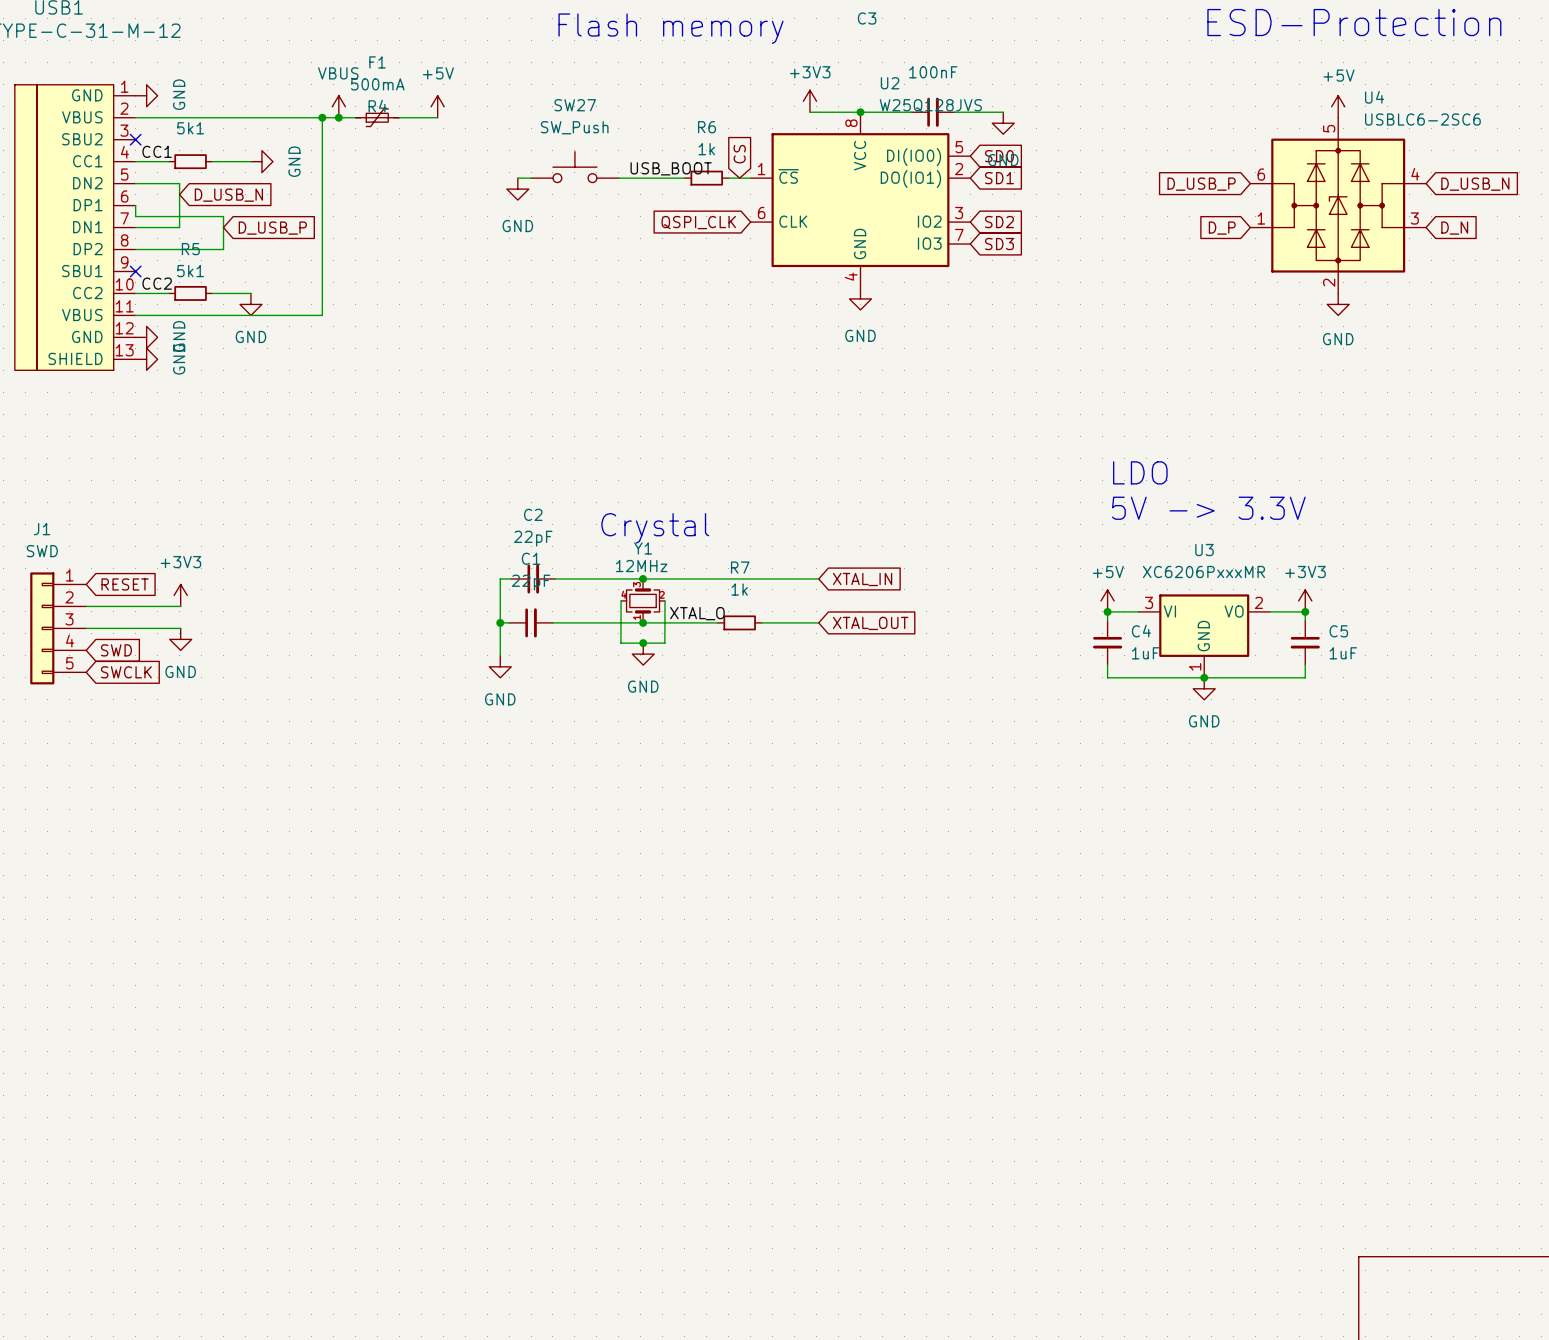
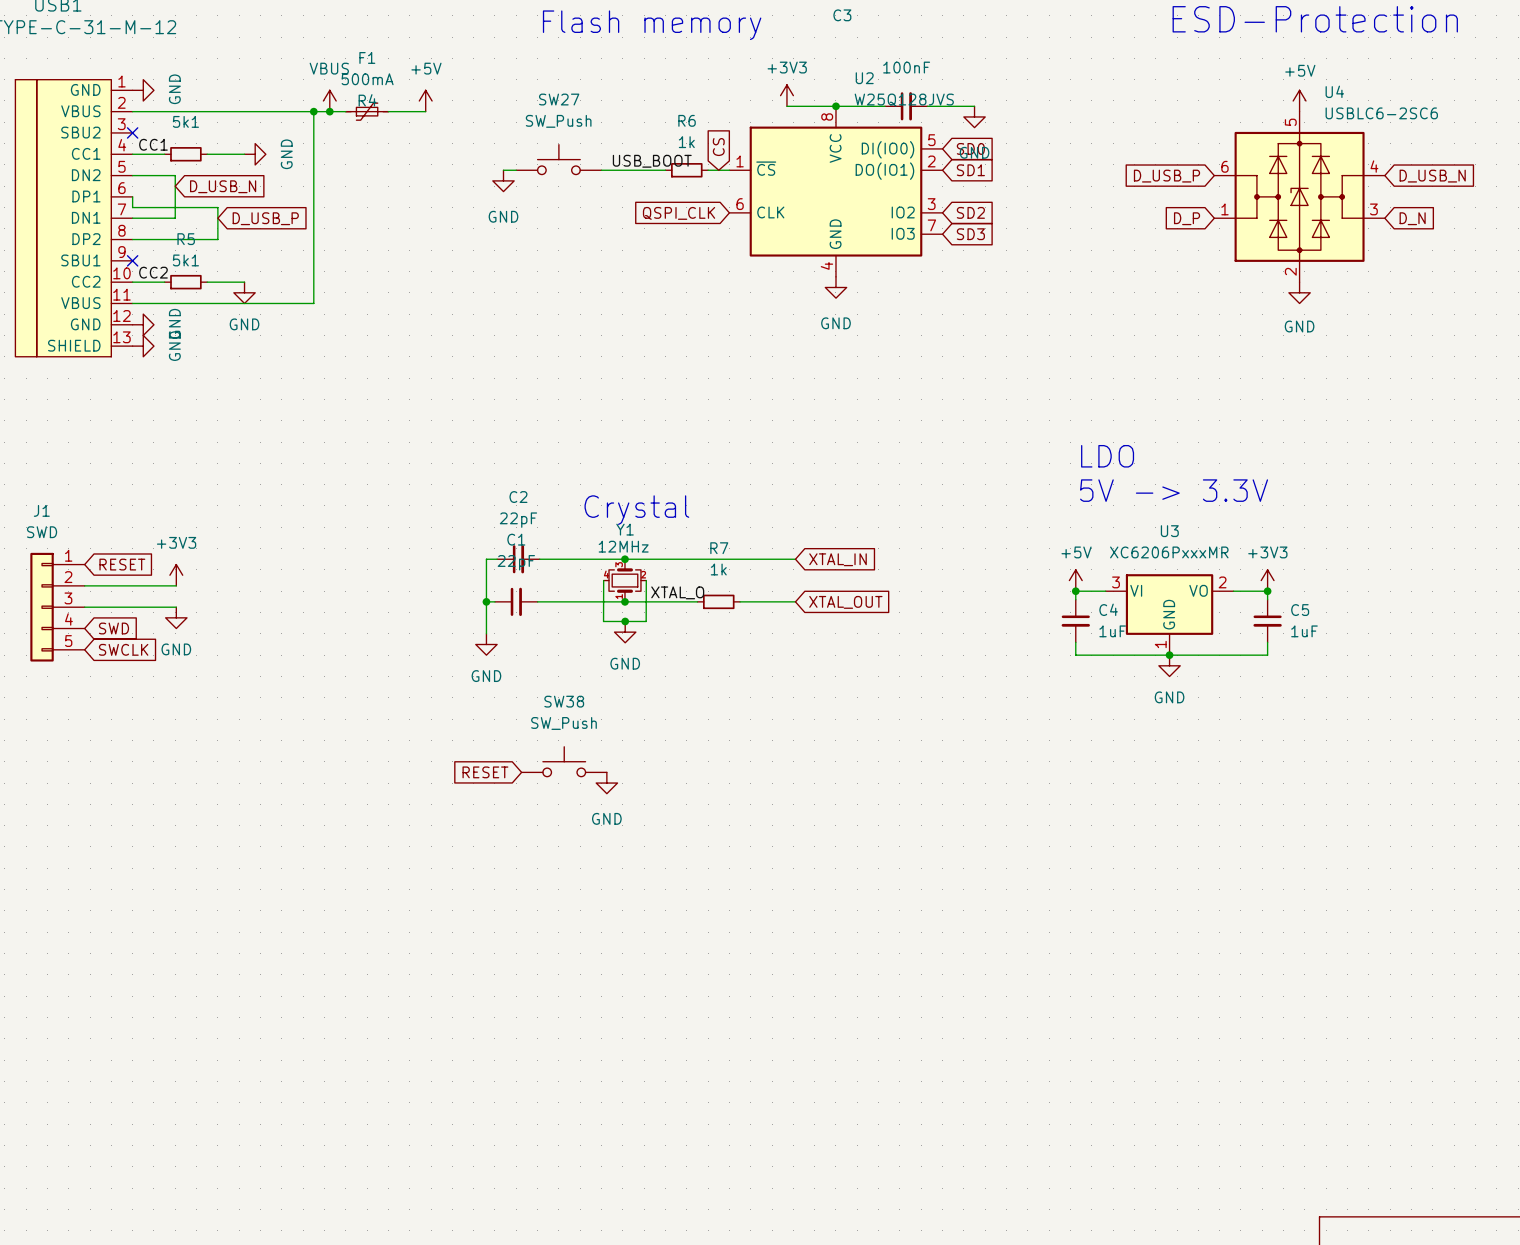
SW38: none -> SW_Push (564, 761)
global label: none -> RESET (485, 772)
power symbol: none -> GND (606, 783)

